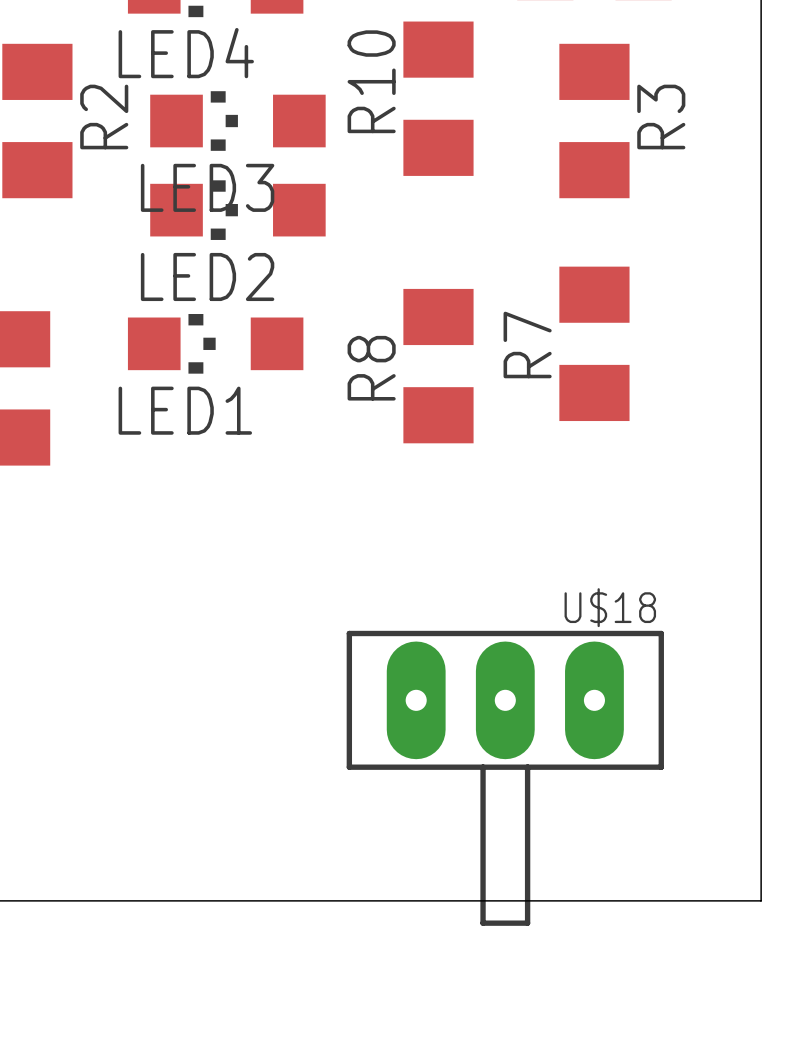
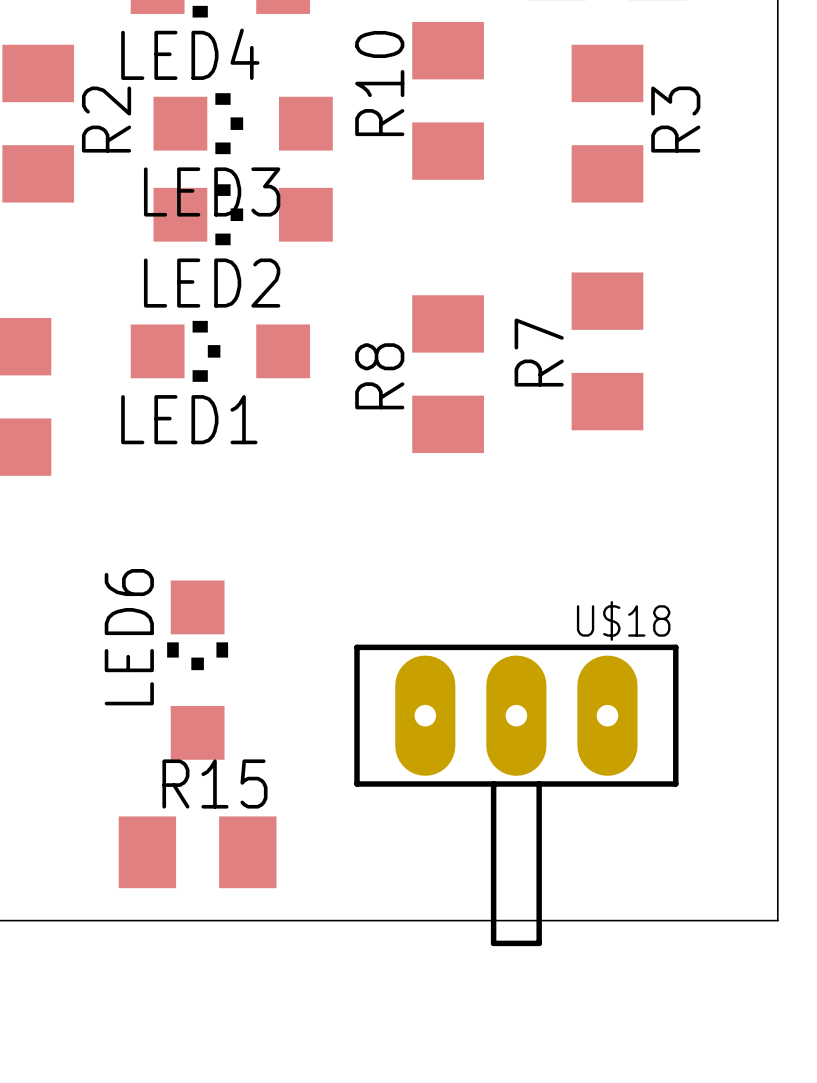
LED6: none -> (197, 670)
R15: none -> (197, 852)

